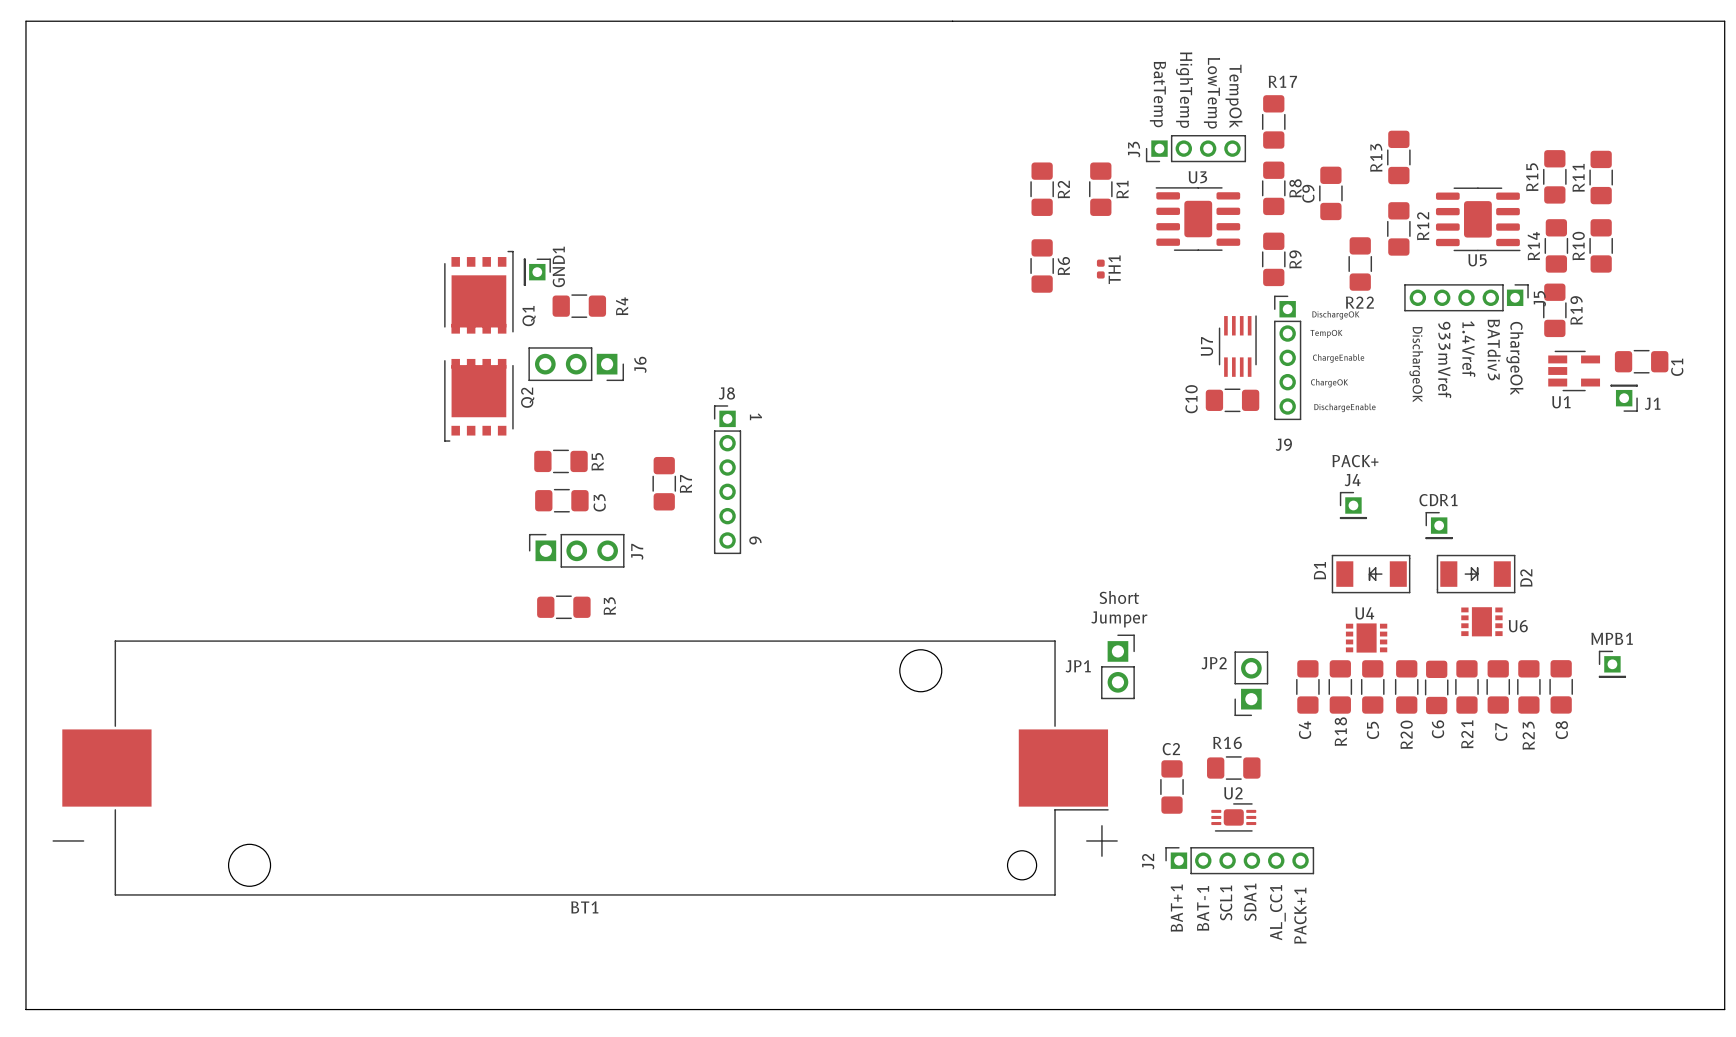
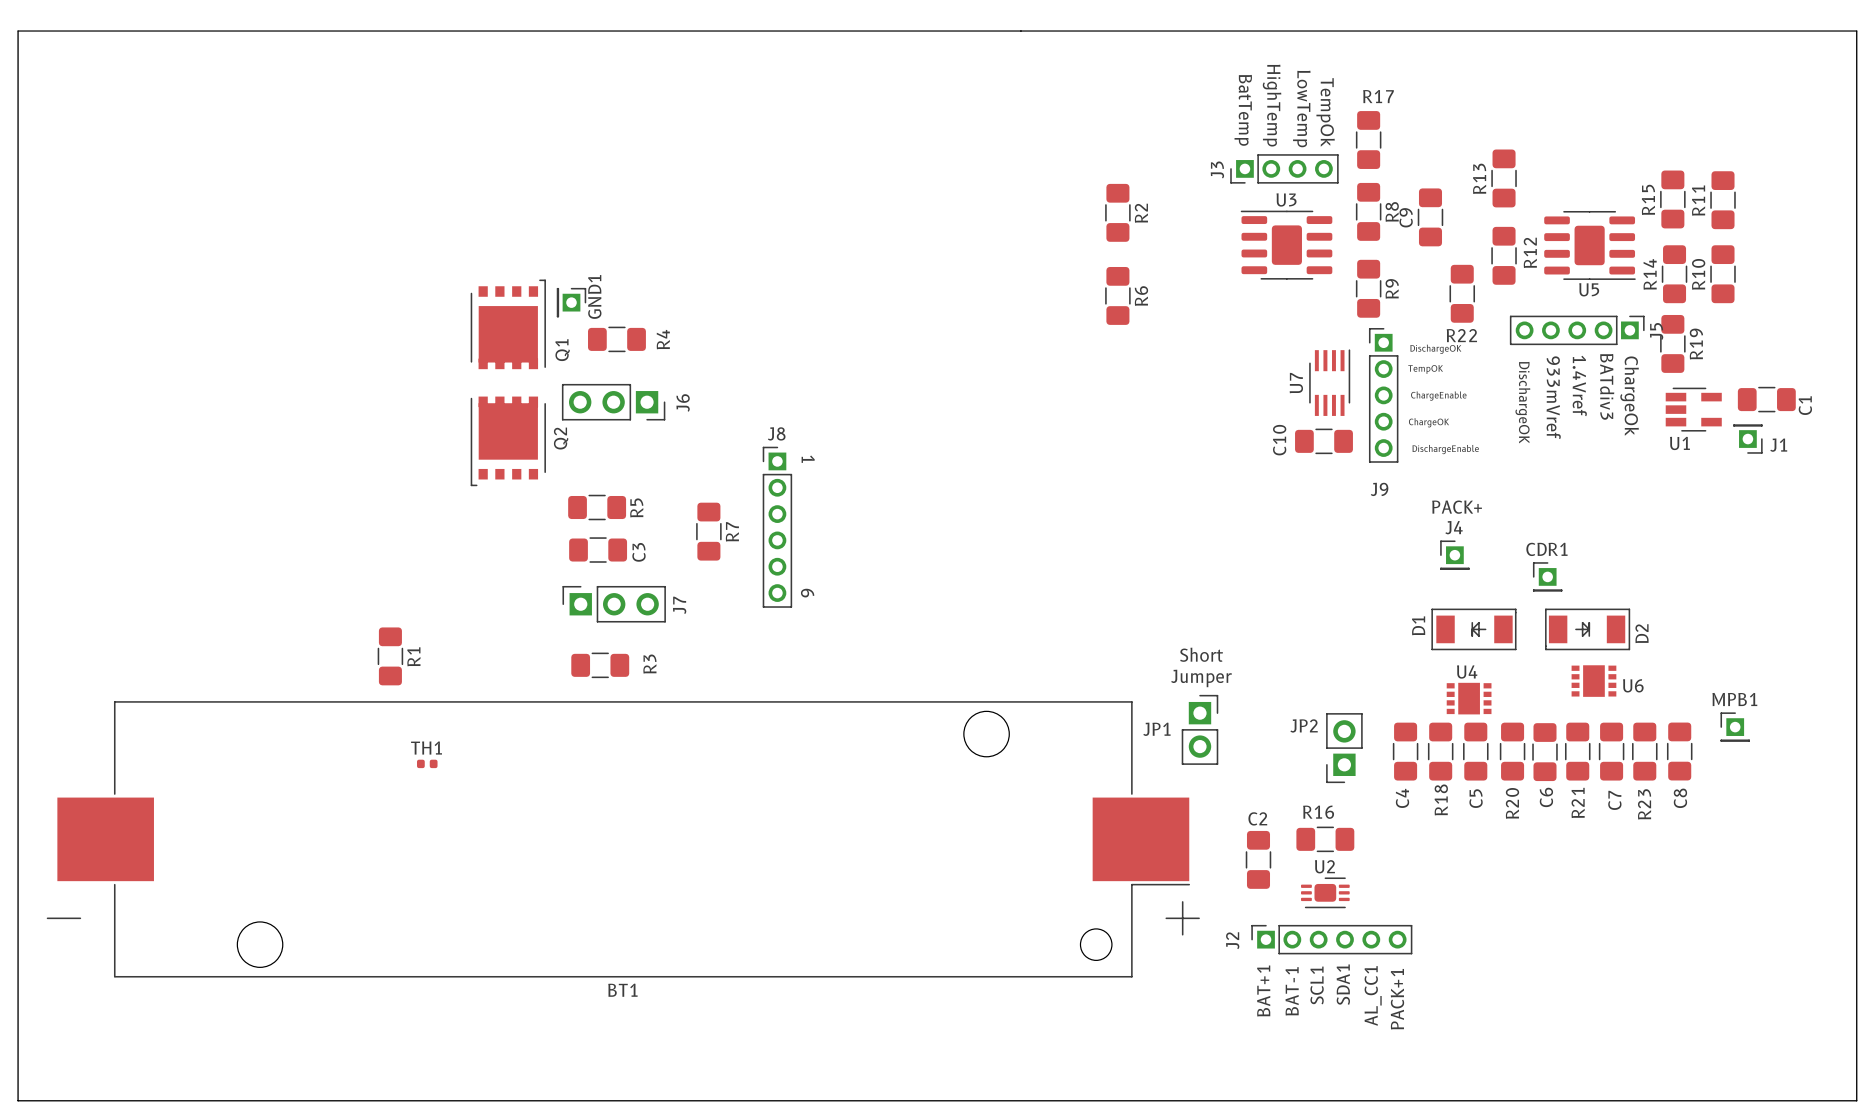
R1 position: (1100, 189) -> (390, 656)
TH1 rotation: 0° (1100, 269) -> 90° clockwise (427, 763)
TH1 position: (1100, 269) -> (427, 763)

